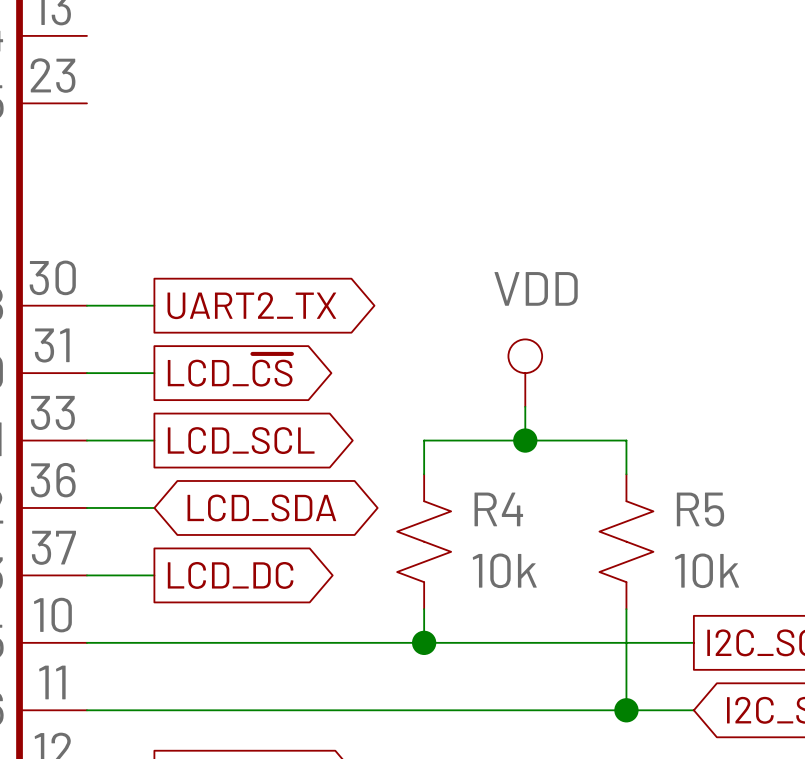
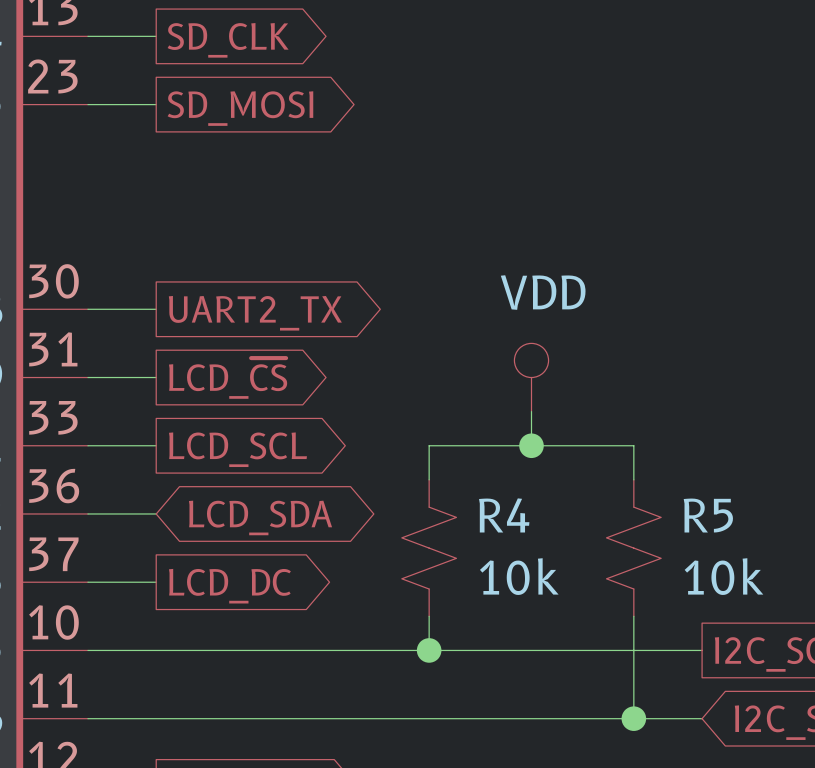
wire: none -> (87, 36) (156, 36)
global label: none -> SD_CLK (228, 40)
wire: none -> (87, 104) (156, 104)
global label: none -> SD_MOSI (240, 108)

